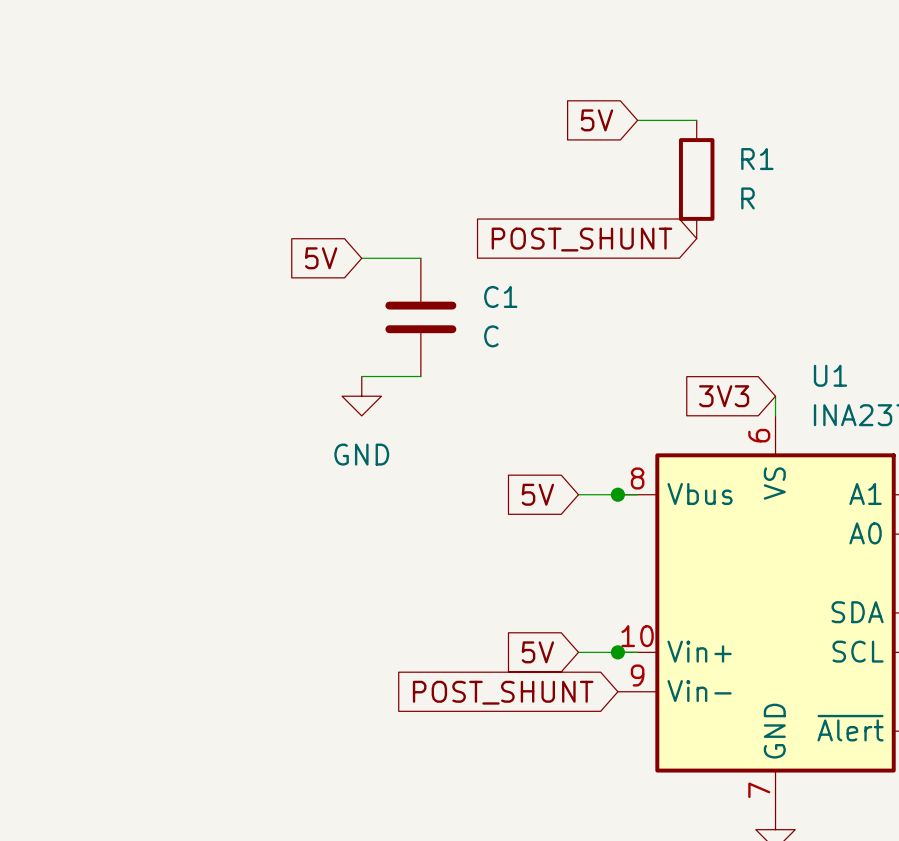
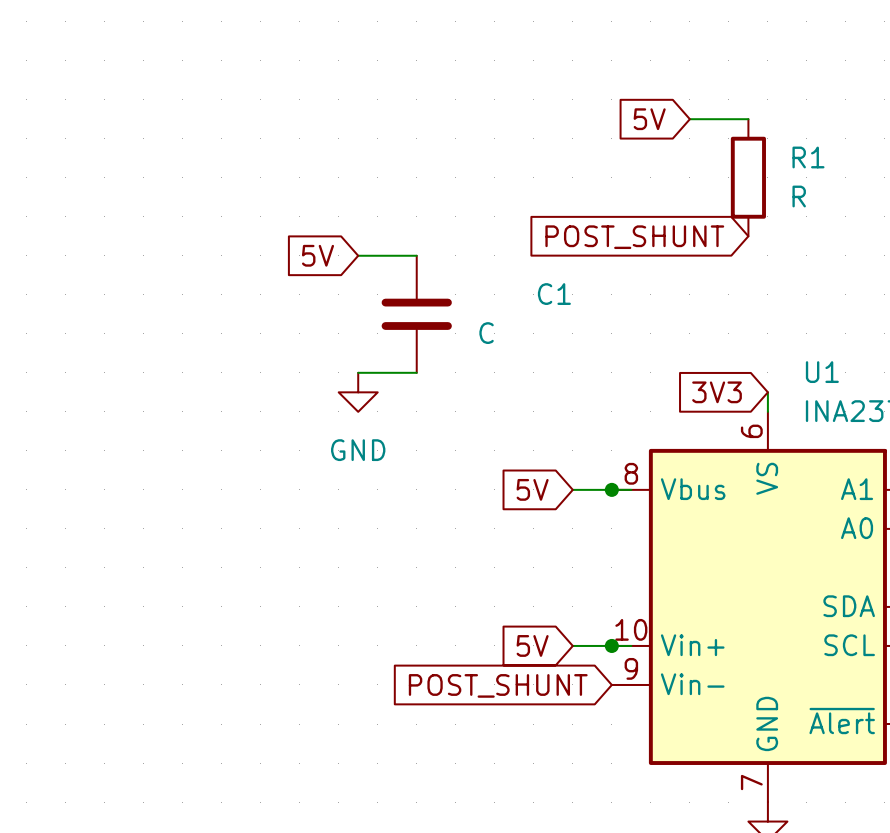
global label position: 5V (596, 120) -> 5V (649, 119)
wire: (637, 120) (696, 120) -> (748, 119) (689, 119)
R1 position: (696, 179) -> (748, 177)
global label position: POST_SHUNT (581, 239) -> POST_SHUNT (634, 237)
C1 name position: C1 (500, 296) -> C1 (554, 294)

